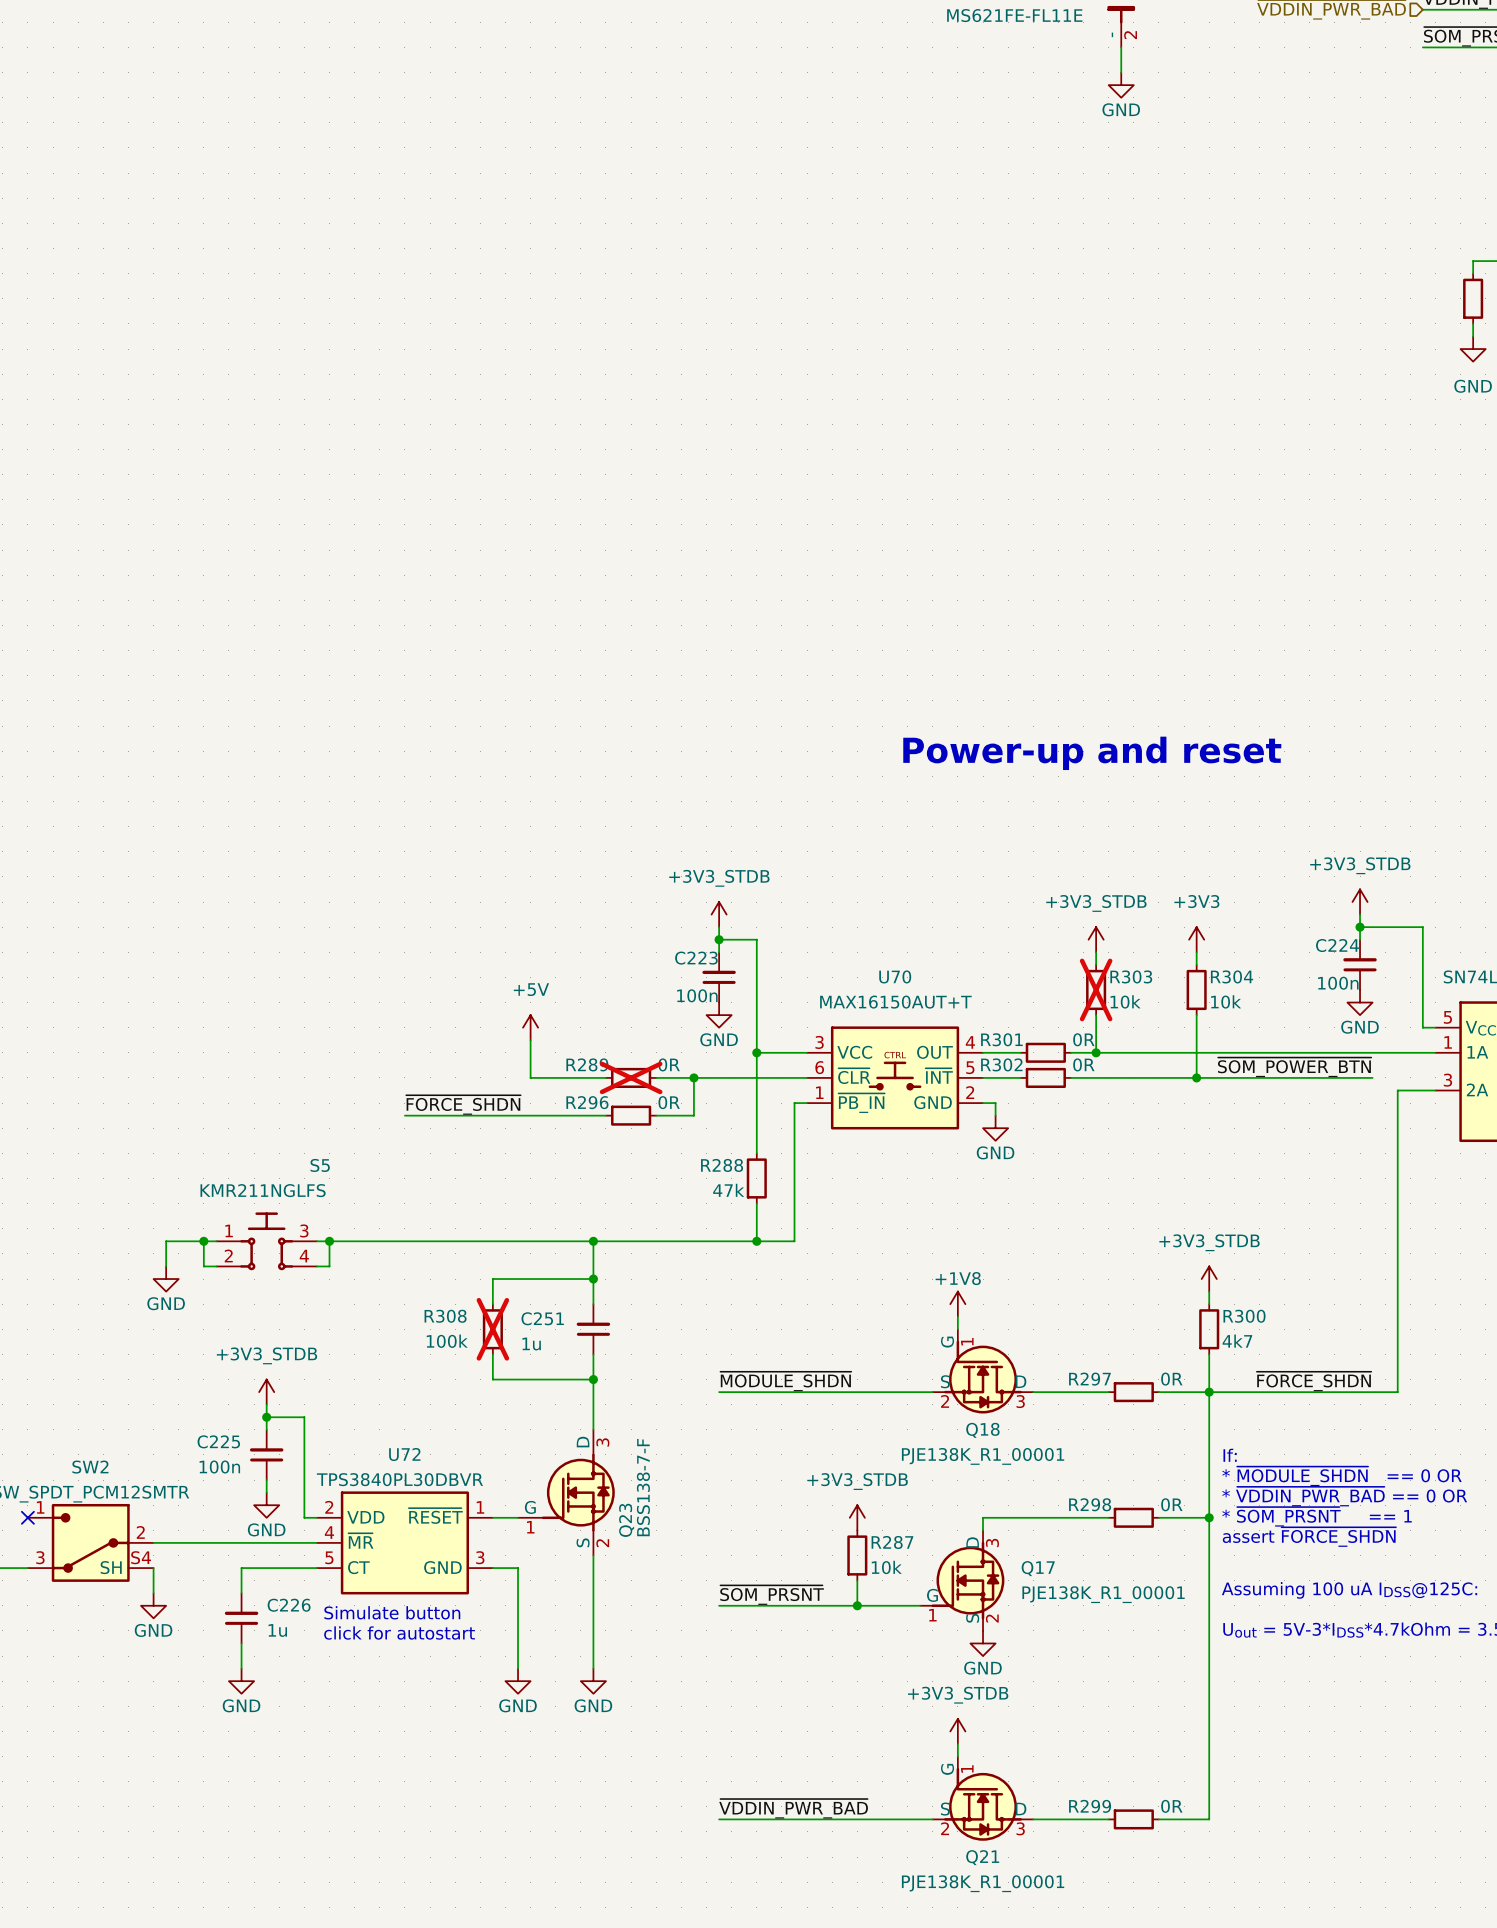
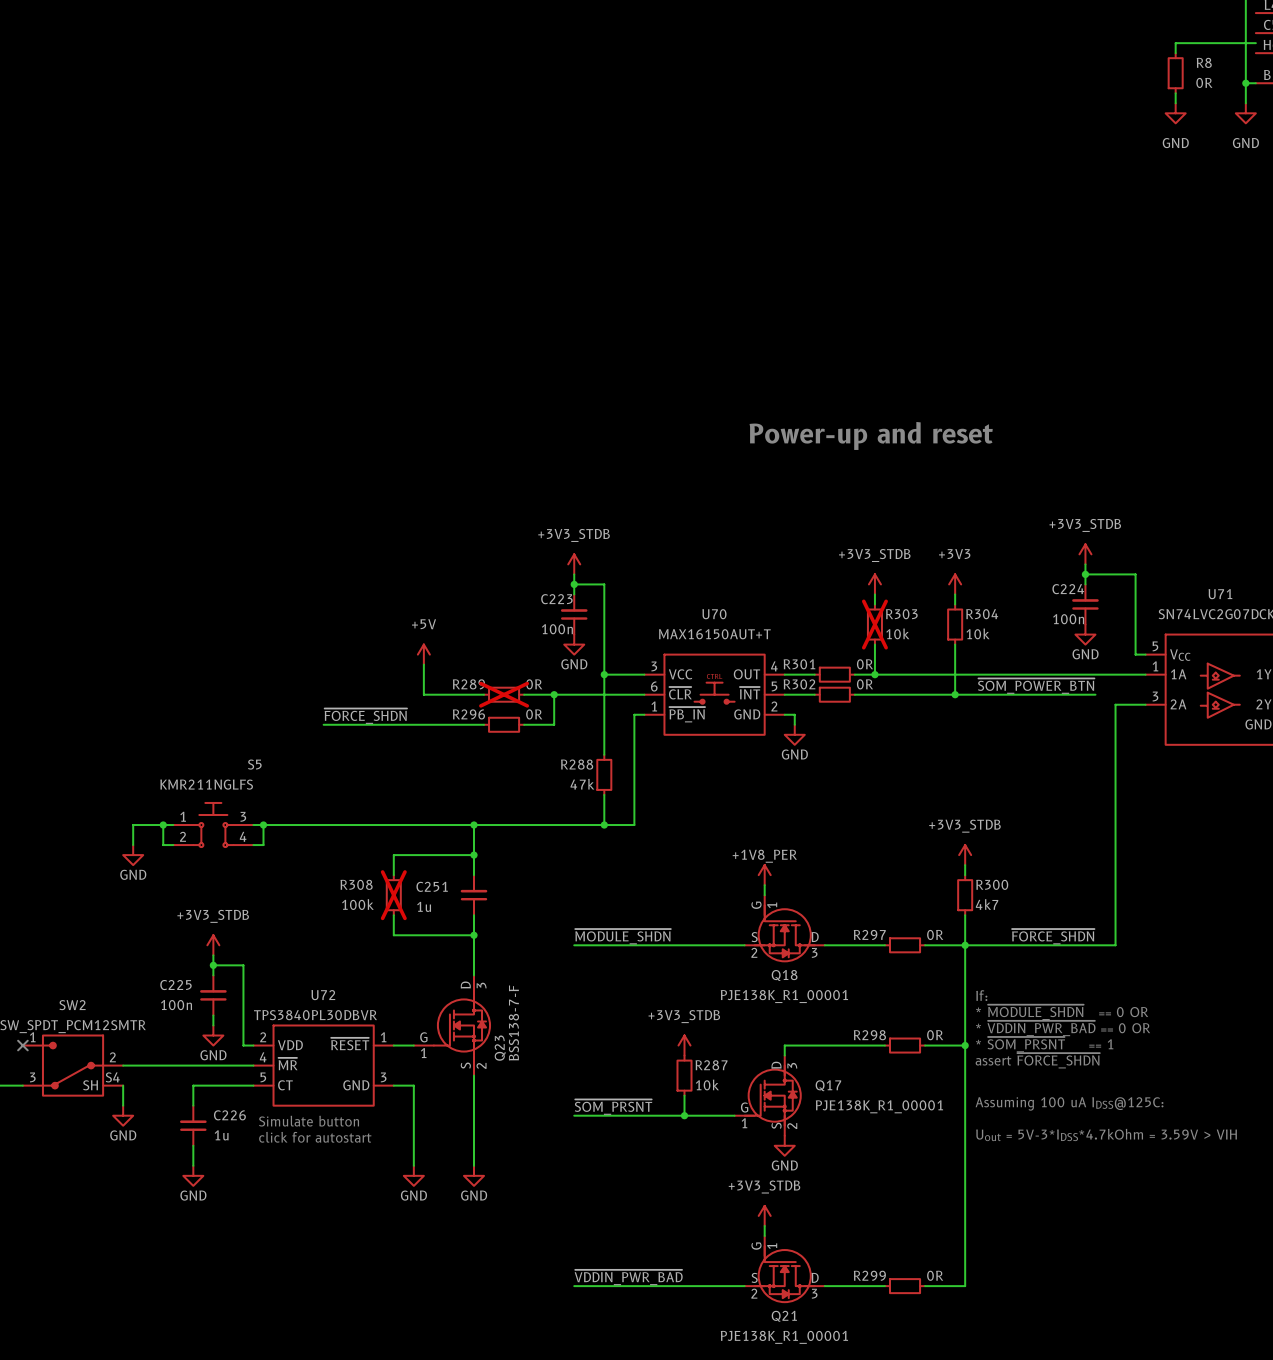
power symbol: +1V8 (957, 1304) -> +1V8_PER (764, 875)

